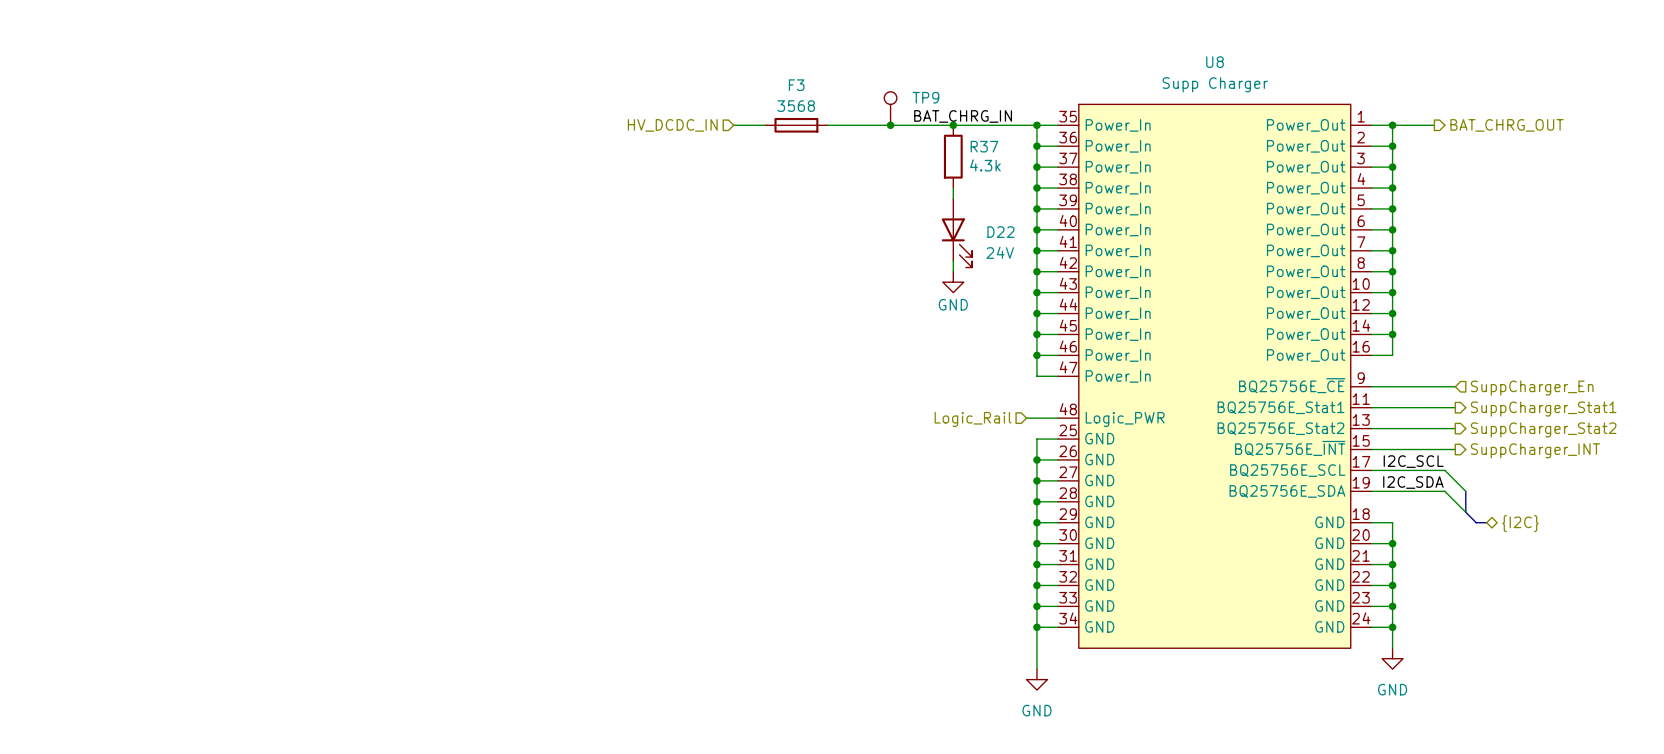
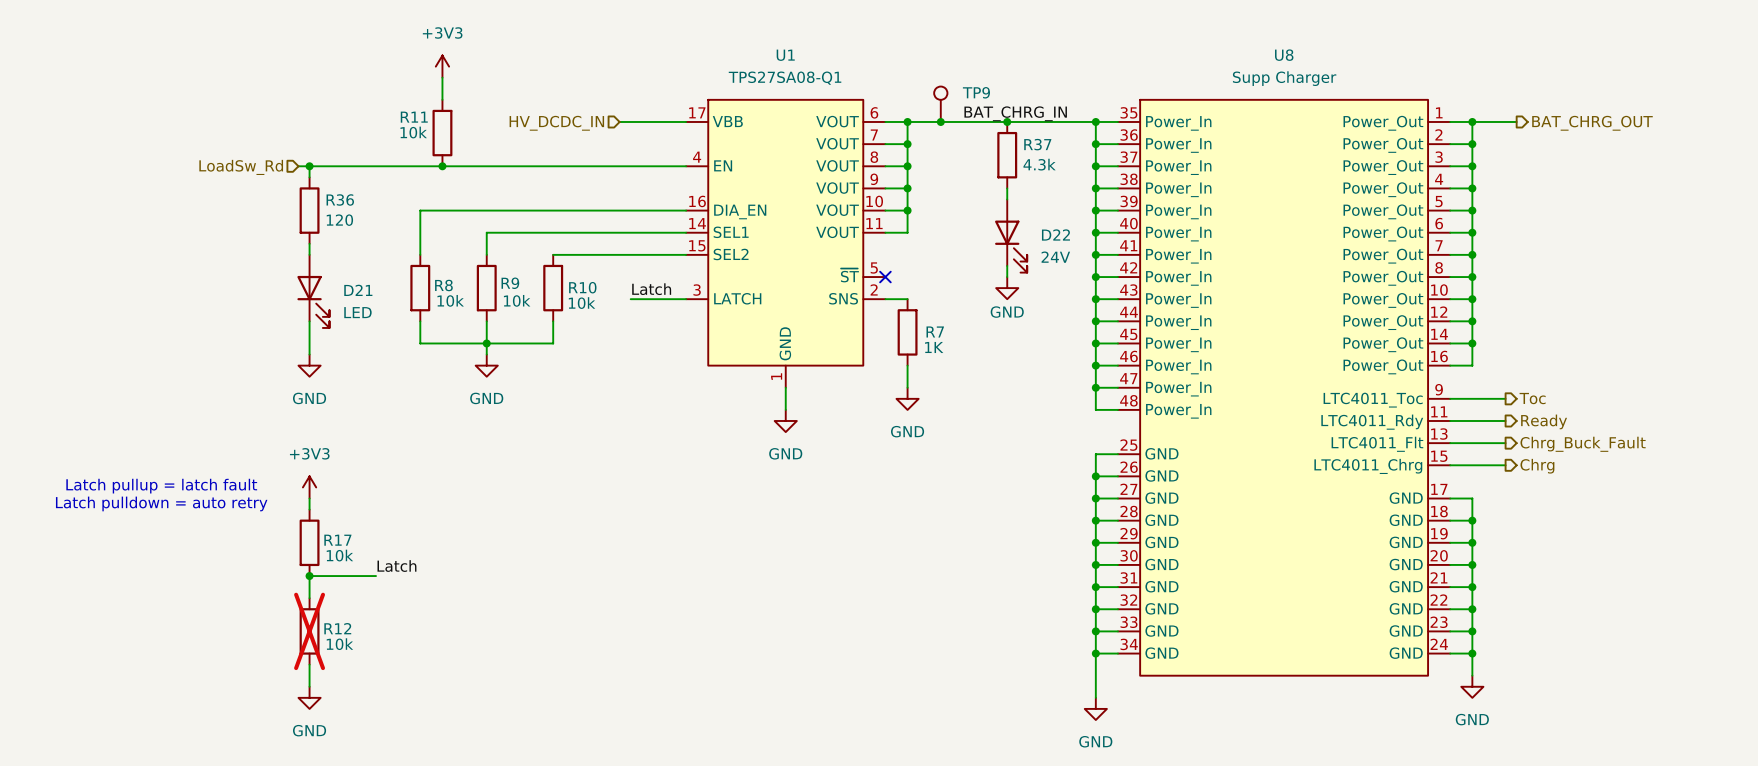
power symbol: none -> +3V3 (442, 66)
wire: none -> (442, 77) (442, 99)
U8 symbol: [1057, 104, 1372, 649] -> [1117, 99, 1451, 676]
wire: none -> (619, 121) (686, 121)
hierarchical label position: HV_DCDC_IN (672, 125) -> HV_DCDC_IN (556, 123)
F3: 3568 (796, 125) -> none
wire: none -> (907, 121) (907, 232) (885, 232)
junction: none -> (907, 121)
R11: none -> 10k (442, 133)
wire: none -> (885, 144) (907, 144)
junction: none -> (907, 144)
hierarchical label: none -> LoadSw_Rd (241, 167)
wire: none -> (298, 166) (686, 166)
wire: none -> (309, 166) (309, 177)
junction: none -> (309, 166)
junction: none -> (442, 166)
wire: none -> (885, 166) (907, 166)
junction: none -> (907, 166)
wire: none -> (885, 188) (907, 188)
junction: none -> (907, 188)
R36: none -> 120 (309, 210)
wire: none -> (686, 210) (420, 210) (420, 254)
wire: none -> (885, 210) (907, 210)
junction: none -> (907, 210)
wire: none -> (686, 232) (486, 232) (486, 254)
wire: none -> (309, 243) (309, 254)
U1: none -> TPS27SA08-Q1 (785, 243)
wire: none -> (553, 254) (686, 254)
no-connect mark: none -> (885, 277)
R8: none -> 10k (420, 288)
R9: none -> 10k (486, 288)
R10: none -> 10k (553, 288)
label: none -> Latch (651, 289)
D21: none -> LED (313, 291)
wire: none -> (630, 299) (686, 299)
wire: none -> (885, 299) (907, 299)
wire: none -> (309, 321) (309, 354)
wire: none -> (420, 321) (420, 343) (553, 343) (553, 321)
wire: none -> (486, 321) (486, 354)
R7: none -> 1K (907, 332)
junction: none -> (486, 343)
power symbol: none -> GND (309, 365)
power symbol: none -> GND (486, 365)
wire: none -> (907, 365) (907, 387)
wire: none -> (785, 387) (785, 409)
wire: none -> (1095, 387) (1095, 409) (1117, 409)
junction: none -> (1095, 387)
power symbol: none -> GND (907, 398)
wire: (1423, 386) (1455, 386) -> none
hierarchical label: none -> Toc (1532, 398)
hierarchical label: SuppCharger_En (1532, 388) -> none
power symbol: none -> GND (785, 420)
wire: (1423, 407) (1455, 407) -> none
hierarchical label: none -> Ready (1544, 421)
hierarchical label: SuppCharger_Stat1 (1543, 409) -> none
wire: (1026, 418) (1057, 418) -> none
hierarchical label: Logic_Rail (973, 419) -> none
wire: (1423, 428) (1455, 428) -> none
hierarchical label: none -> Chrg_Buck_Fault (1583, 444)
hierarchical label: SuppCharger_Stat2 (1543, 429) -> none
wire: (1423, 449) (1455, 449) -> none
hierarchical label: none -> Chrg (1537, 466)
hierarchical label: SuppCharger_INT (1535, 450) -> none
label: I2C_SCL (1413, 461) -> none
text: none -> Latch pullup = latch fault (161, 486)
power symbol: none -> +3V3 (309, 487)
wire: (1371, 470) (1444, 470) (1465, 491) -> none
wire: none -> (309, 498) (309, 509)
wire: none -> (1450, 498) (1472, 498) (1472, 542)
label: I2C_SDA (1413, 482) -> none
text: none -> Latch pulldown = auto retry (161, 503)
wire: (1371, 491) (1444, 491) (1465, 512) -> none
bus: (1465, 491) (1465, 512) (1476, 522) (1486, 522) -> none
wire: none -> (1450, 520) (1472, 520)
junction: none -> (1472, 520)
R17: none -> 10k (309, 542)
junction: none -> (1472, 542)
hierarchical label: {I2C} (1520, 523) -> none
label: none -> Latch (396, 566)
junction: none -> (309, 576)
wire: none -> (376, 576) (309, 576) (309, 598)
R12: none -> 10k (309, 631)
wire: none -> (309, 664) (309, 686)
power symbol: none -> GND (309, 697)

